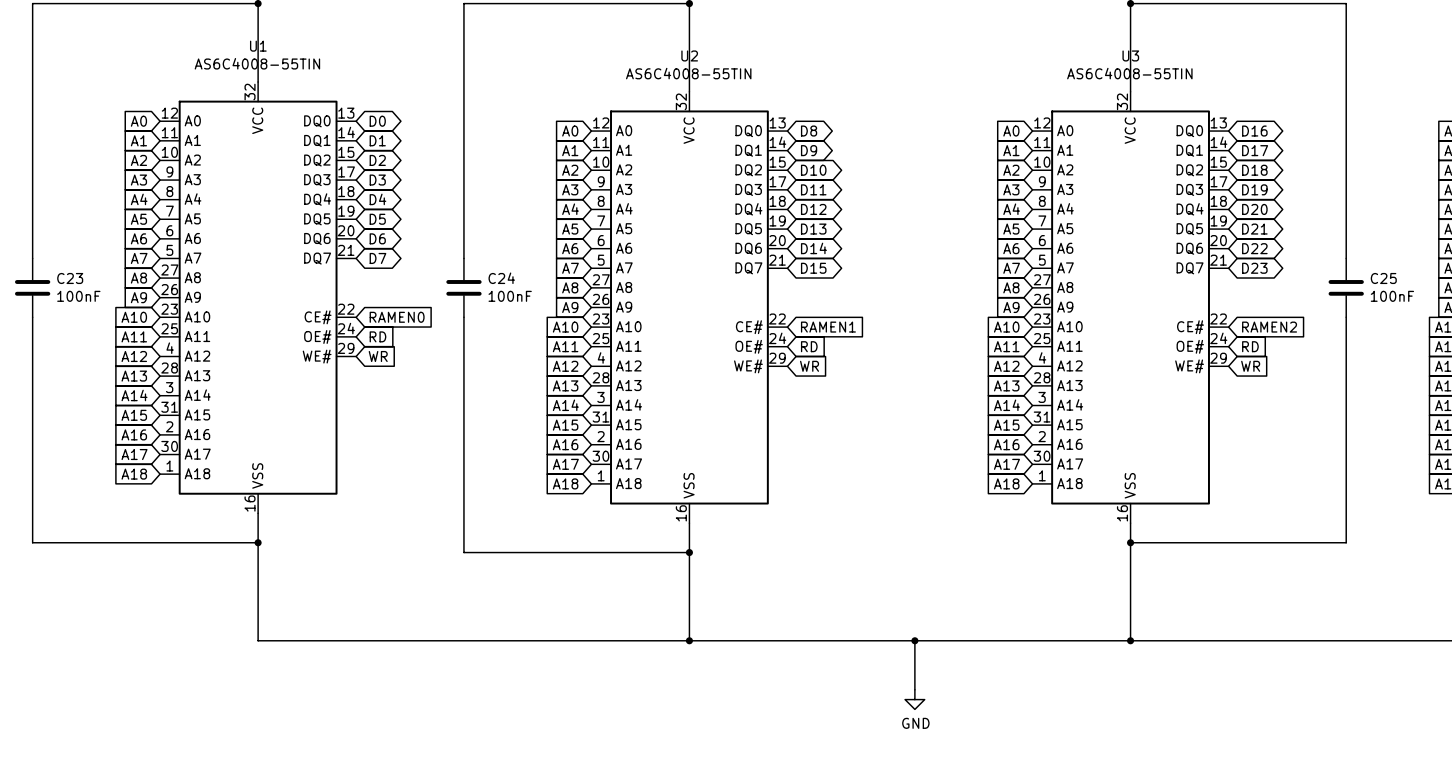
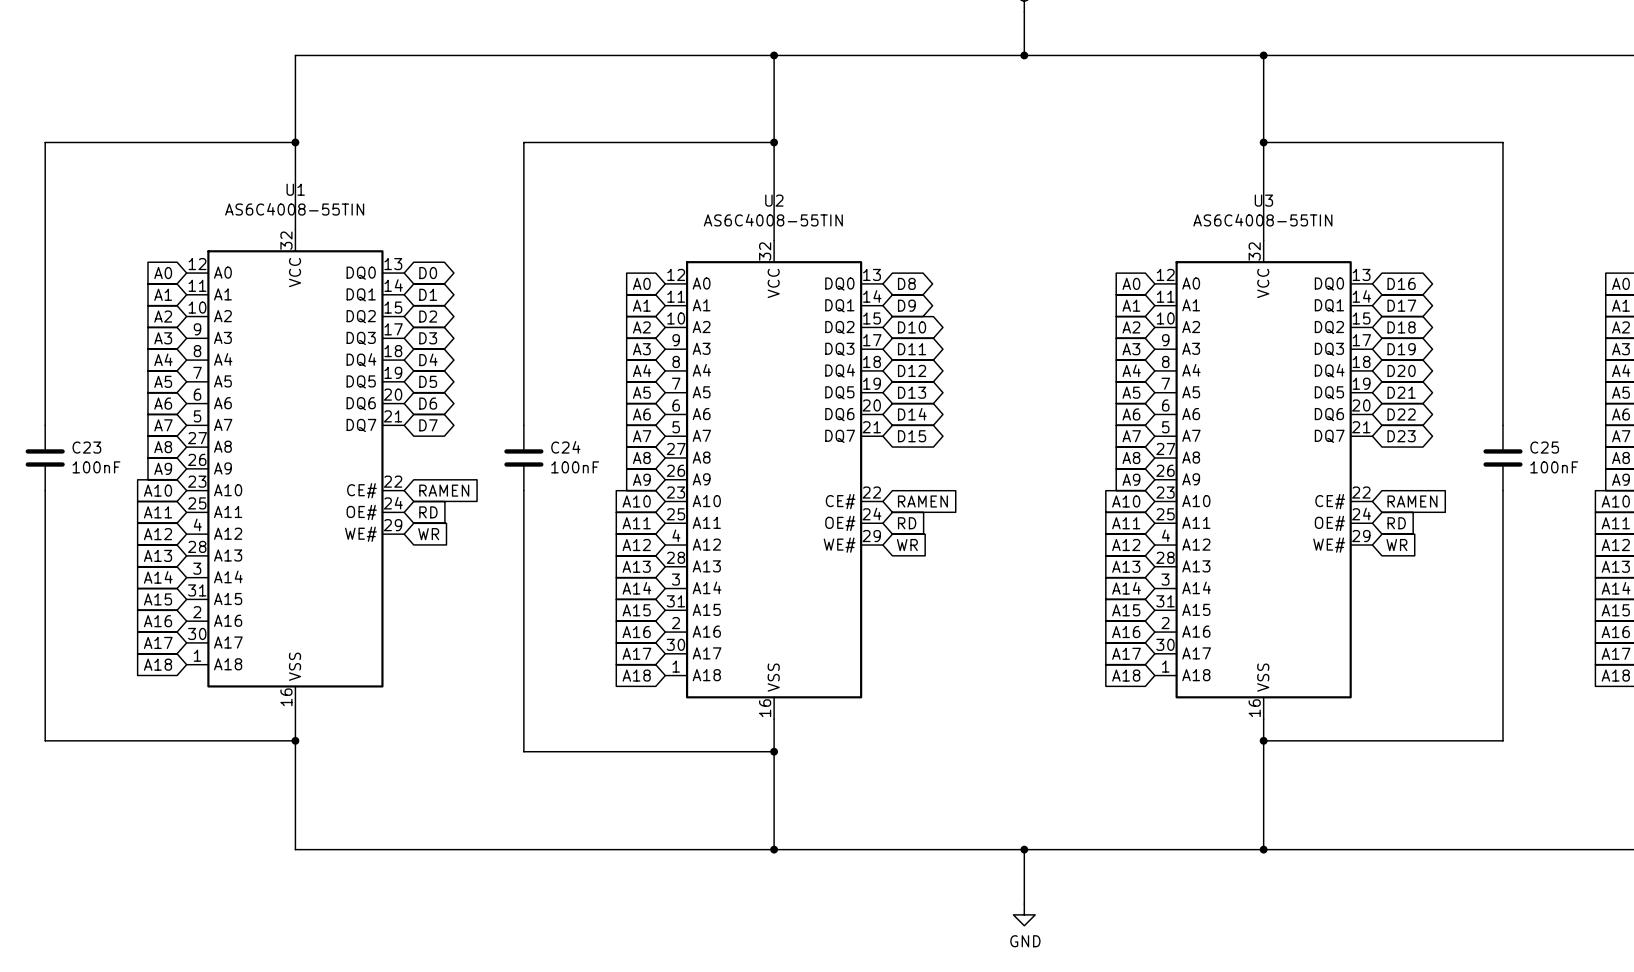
global label: RAMEN0 (397, 317) -> RAMEN (444, 490)
global label: RAMEN1 (828, 327) -> RAMEN (922, 501)
global label: RAMEN2 (1269, 327) -> RAMEN (1412, 501)

